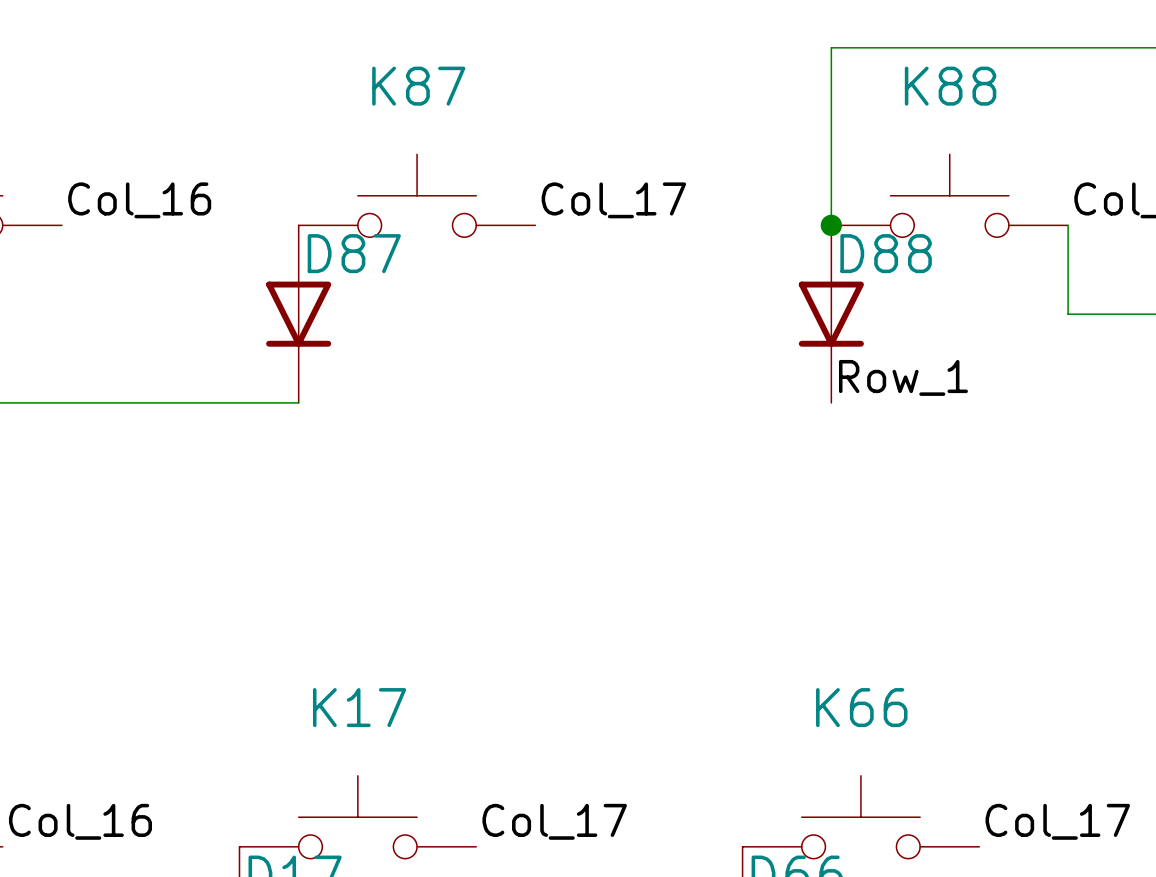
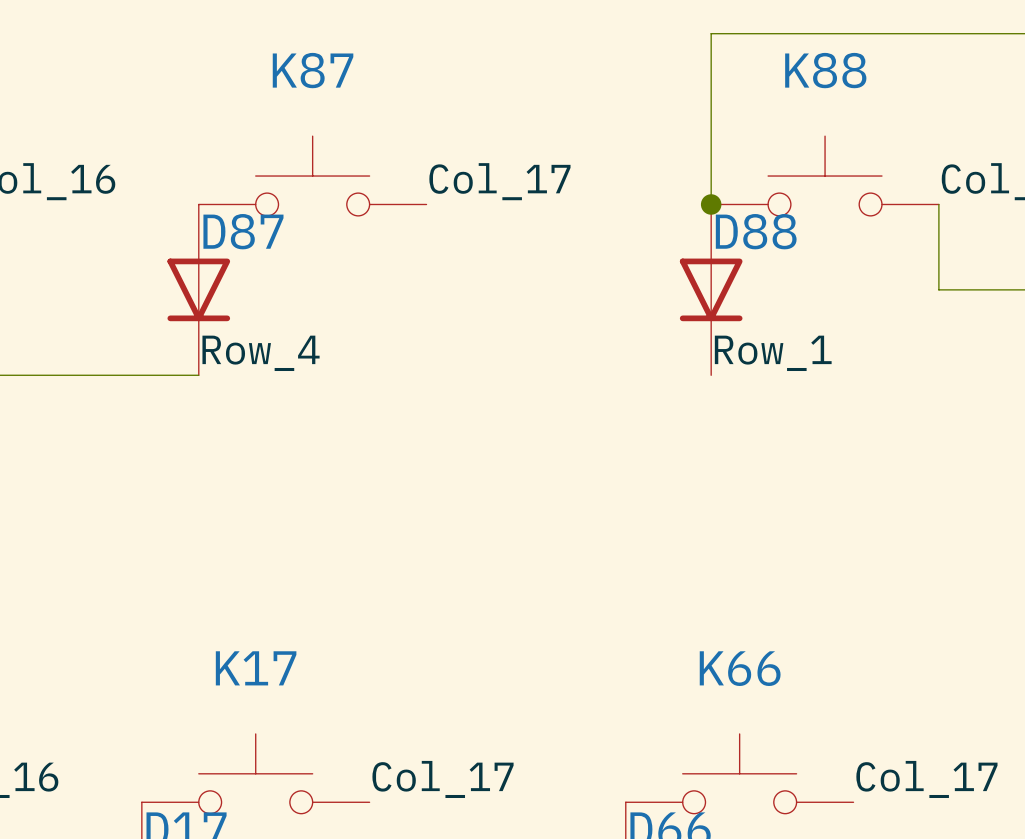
label: none -> Row_4 (261, 353)

